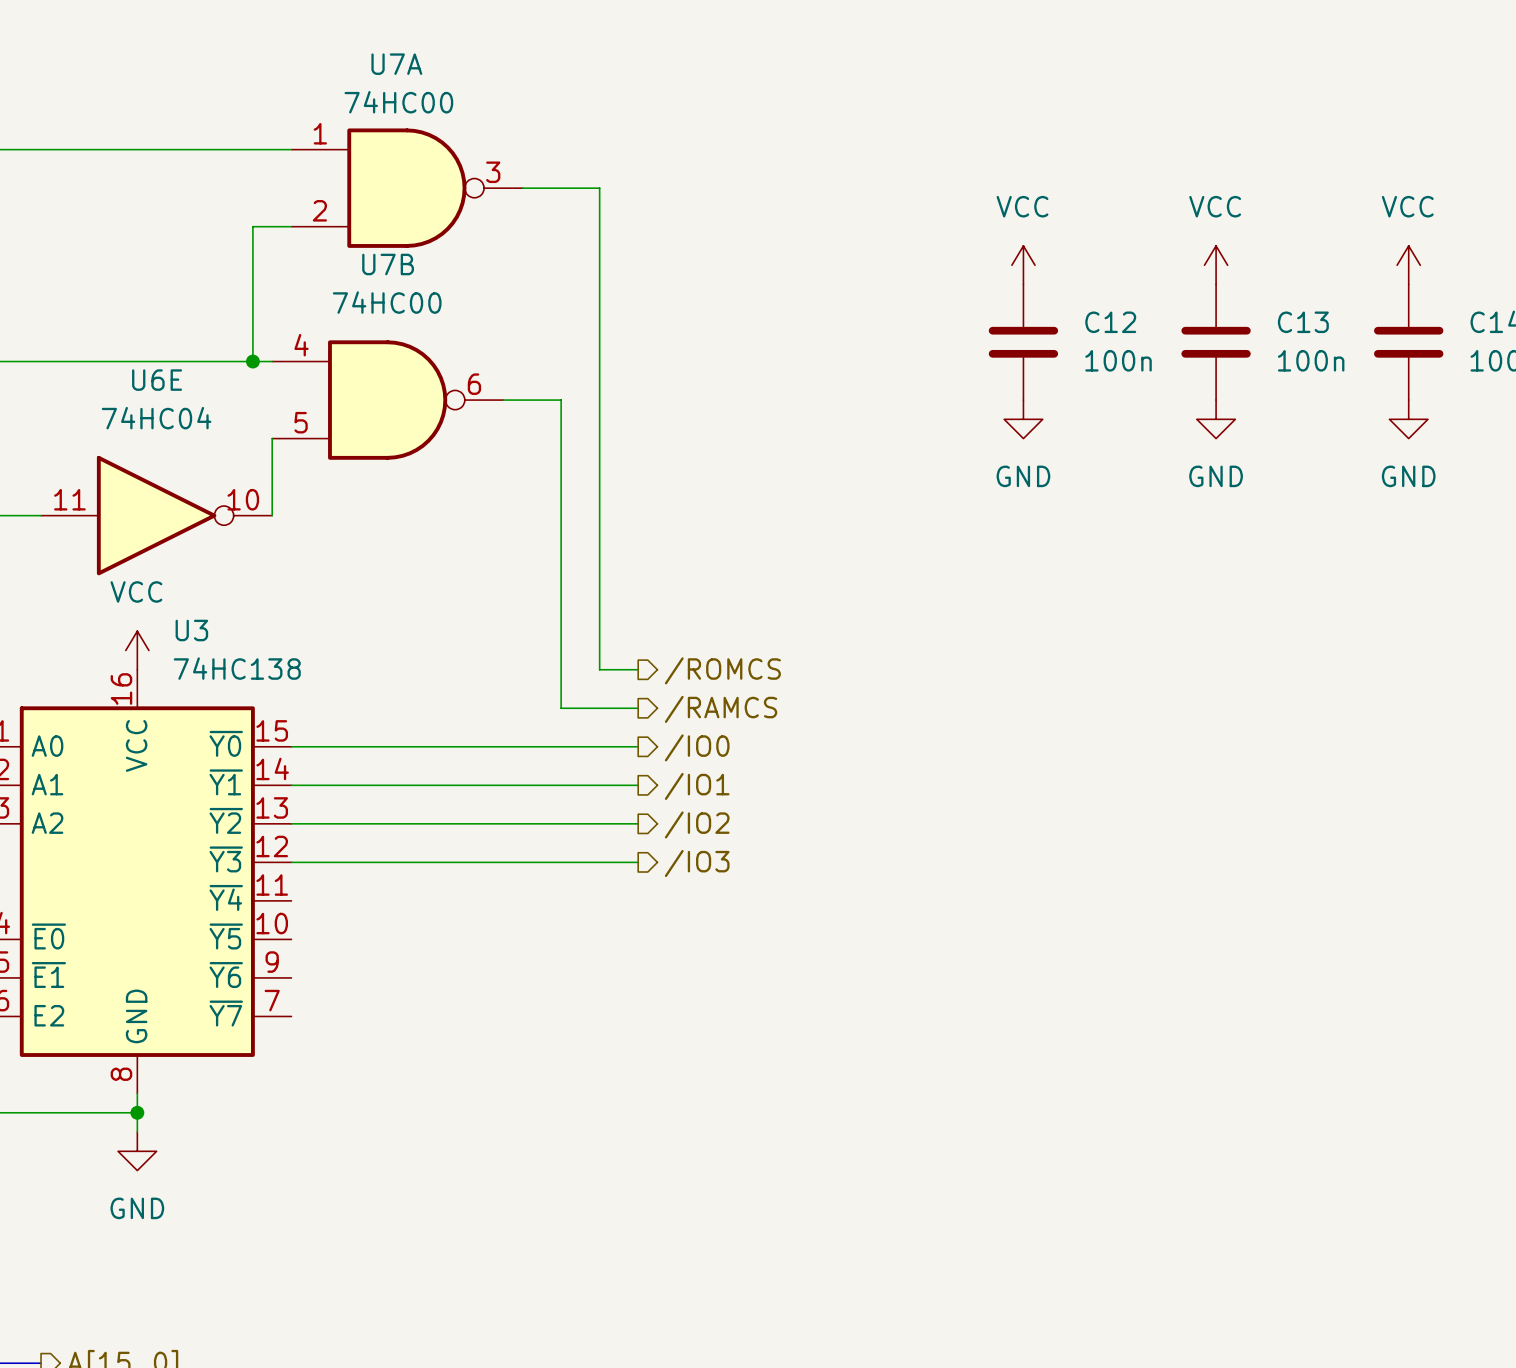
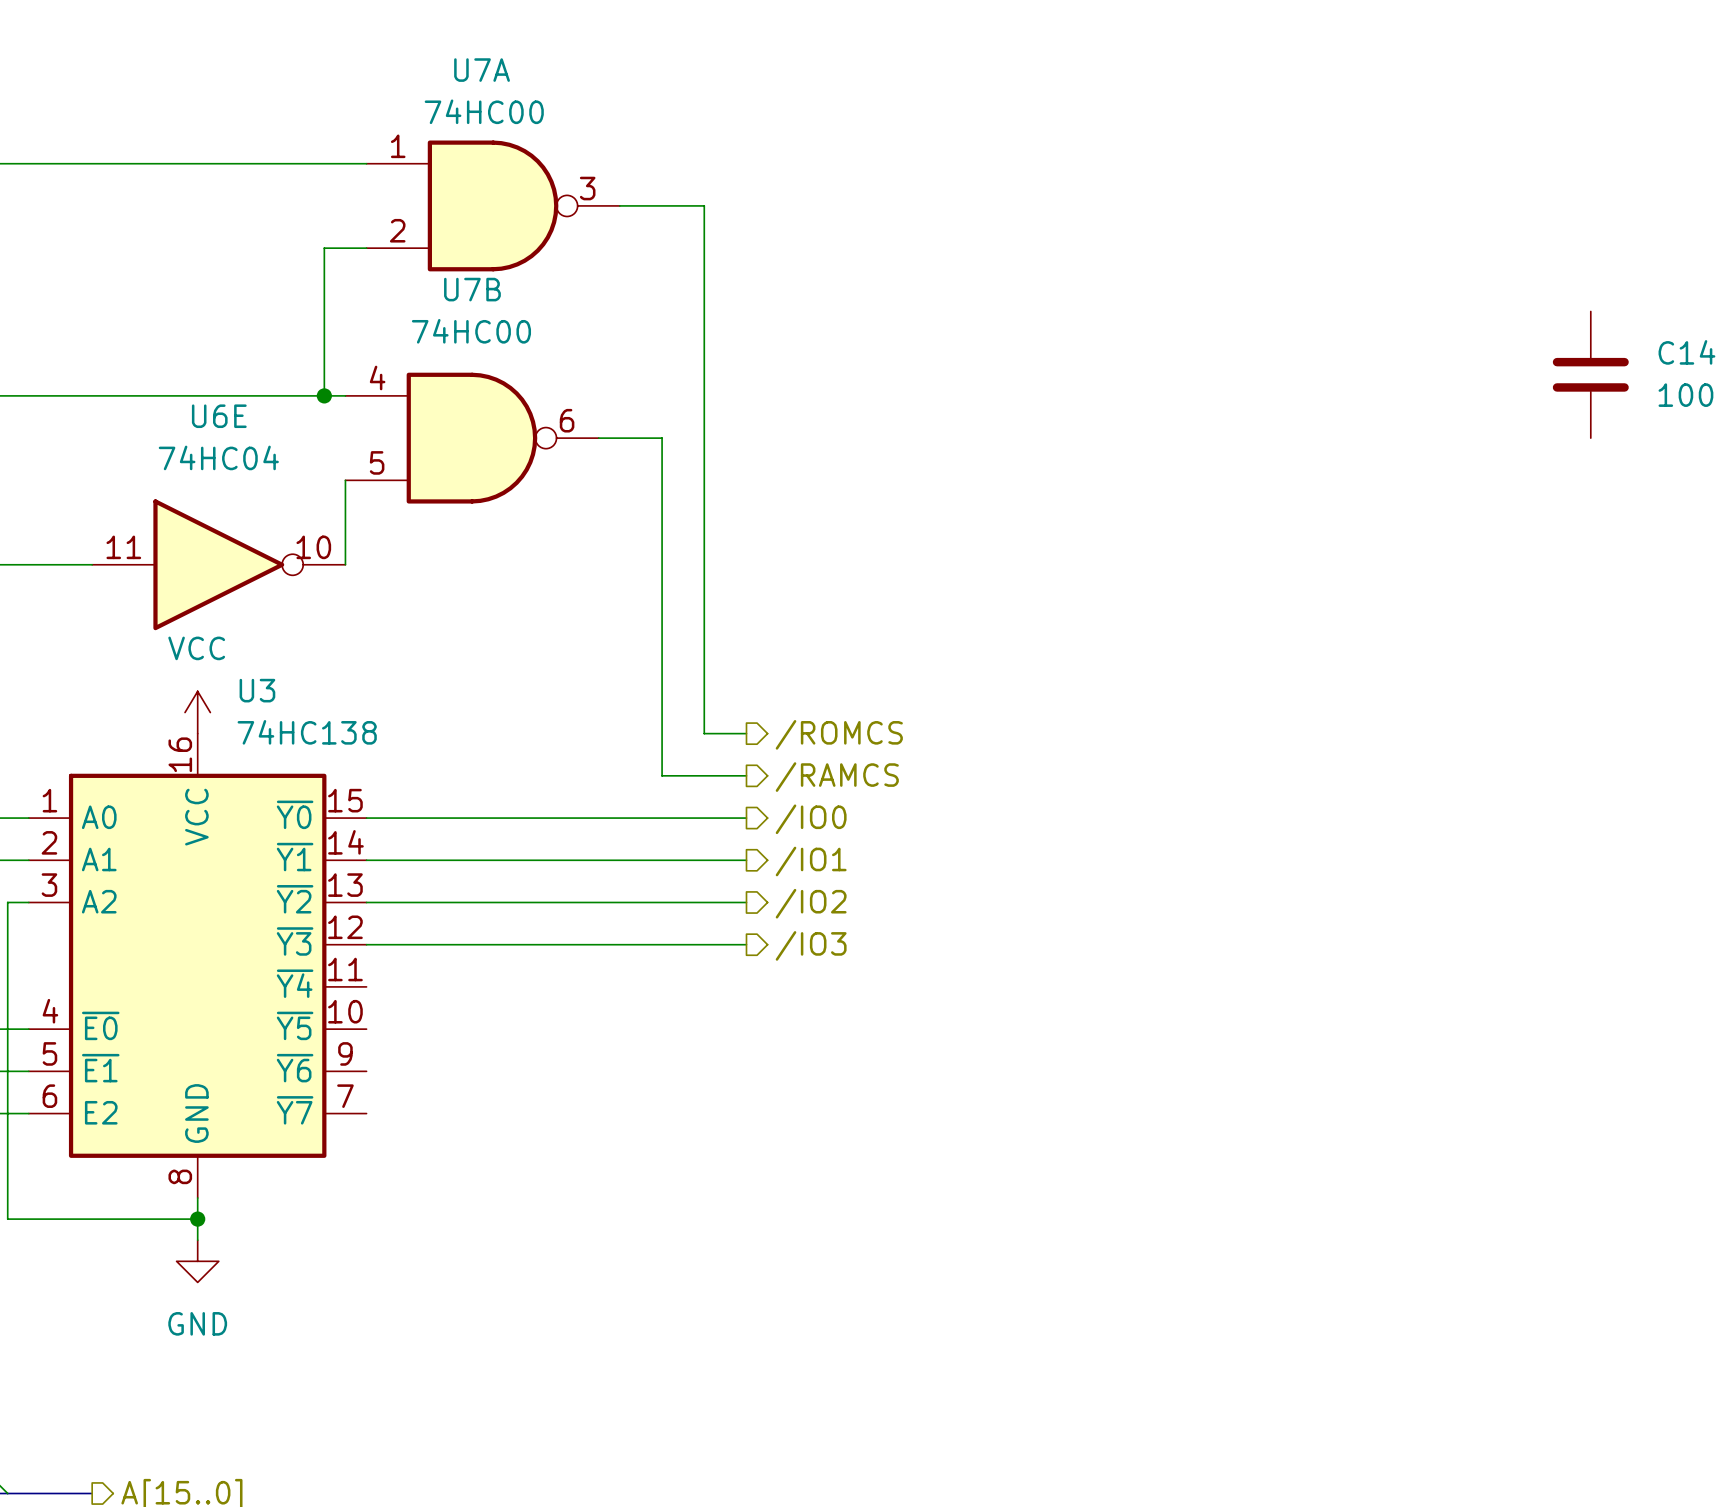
power symbol: VCC (1023, 265) -> none
power symbol: VCC (1216, 265) -> none
power symbol: VCC (1408, 265) -> none
C12: 100n (1023, 342) -> none
C13: 100n (1216, 342) -> none
power symbol: GND (1023, 419) -> none
power symbol: GND (1216, 419) -> none
power symbol: GND (1408, 419) -> none

